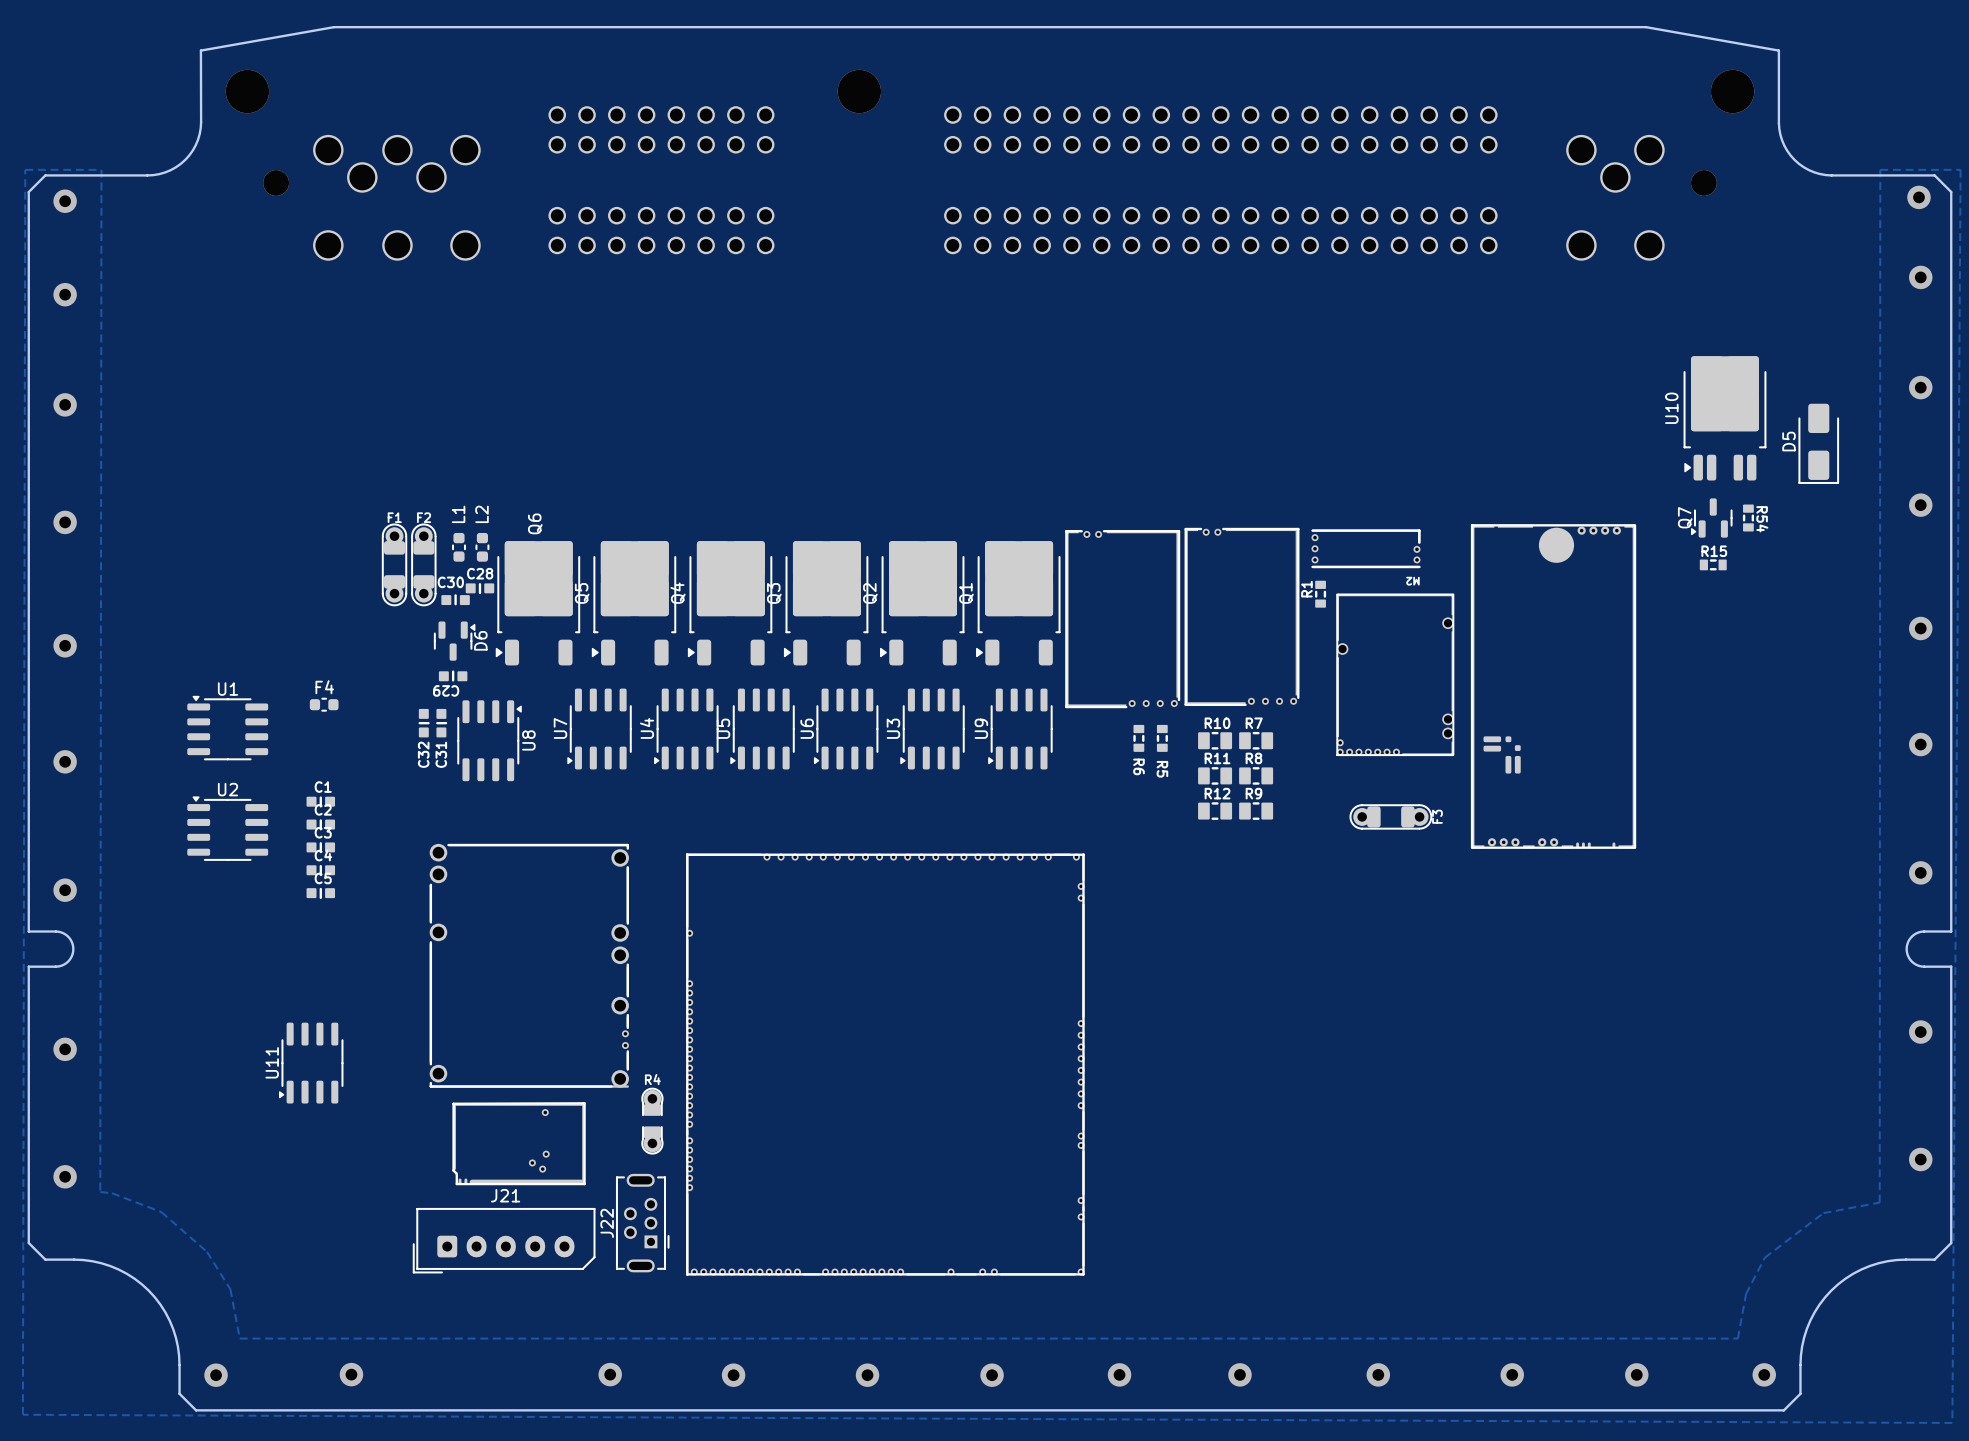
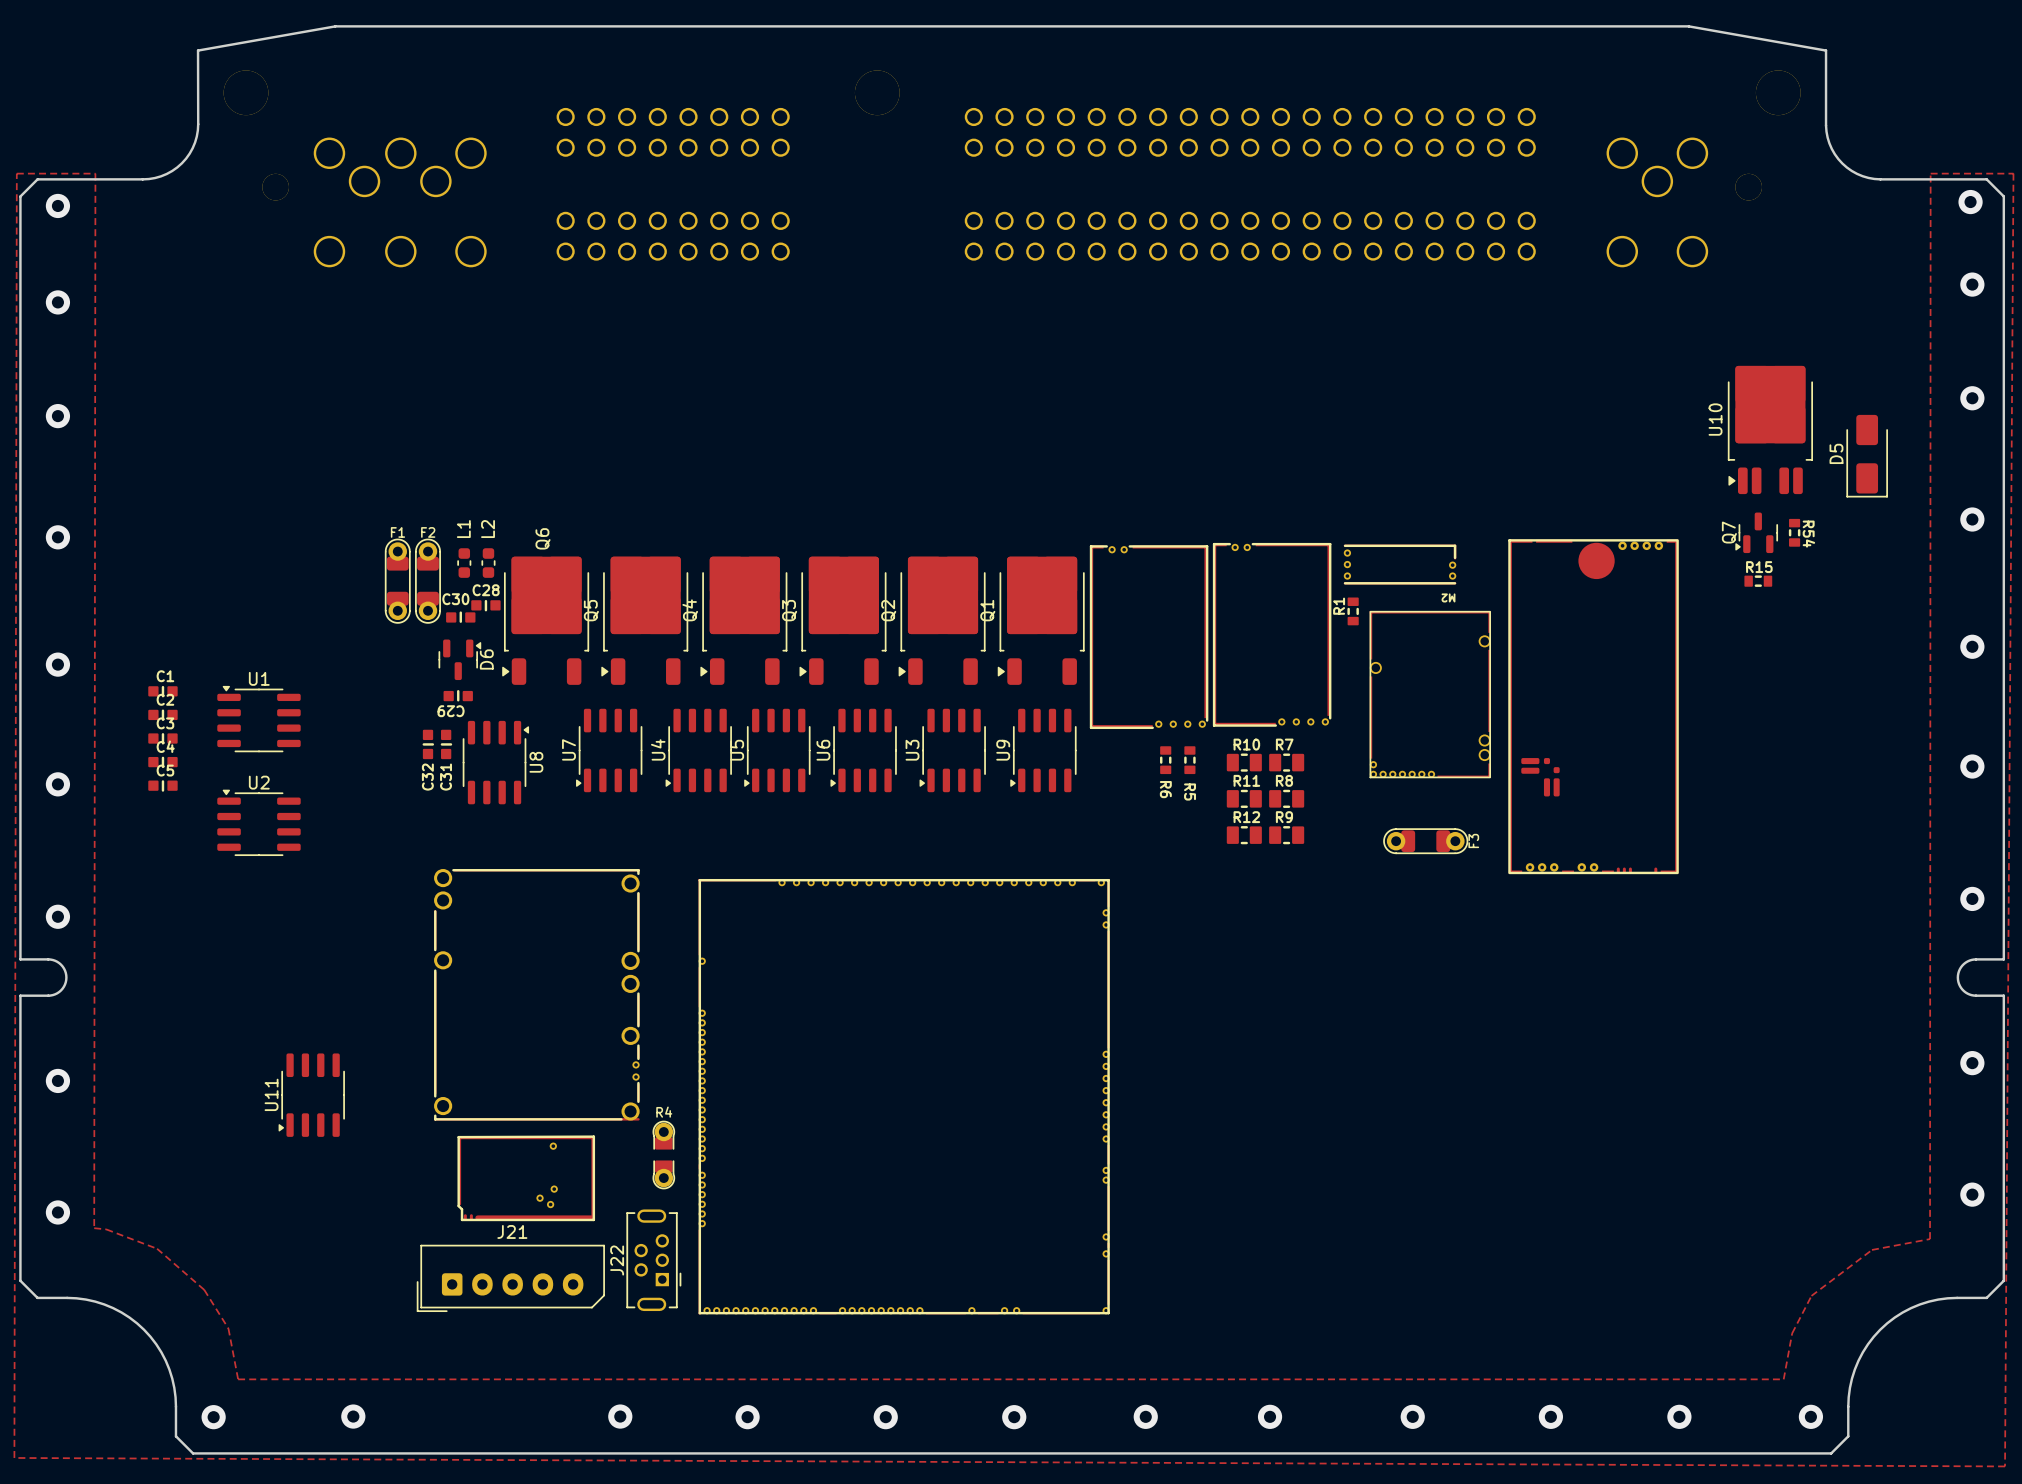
F4: (324, 704) -> none
U1 position: (227, 727) -> (258, 719)
C1 position: (320, 801) -> (162, 691)
C2 position: (320, 824) -> (162, 715)
U2 position: (227, 828) -> (258, 822)
C3 position: (320, 847) -> (162, 738)
C4 position: (320, 870) -> (162, 762)
C5 position: (320, 893) -> (162, 785)

